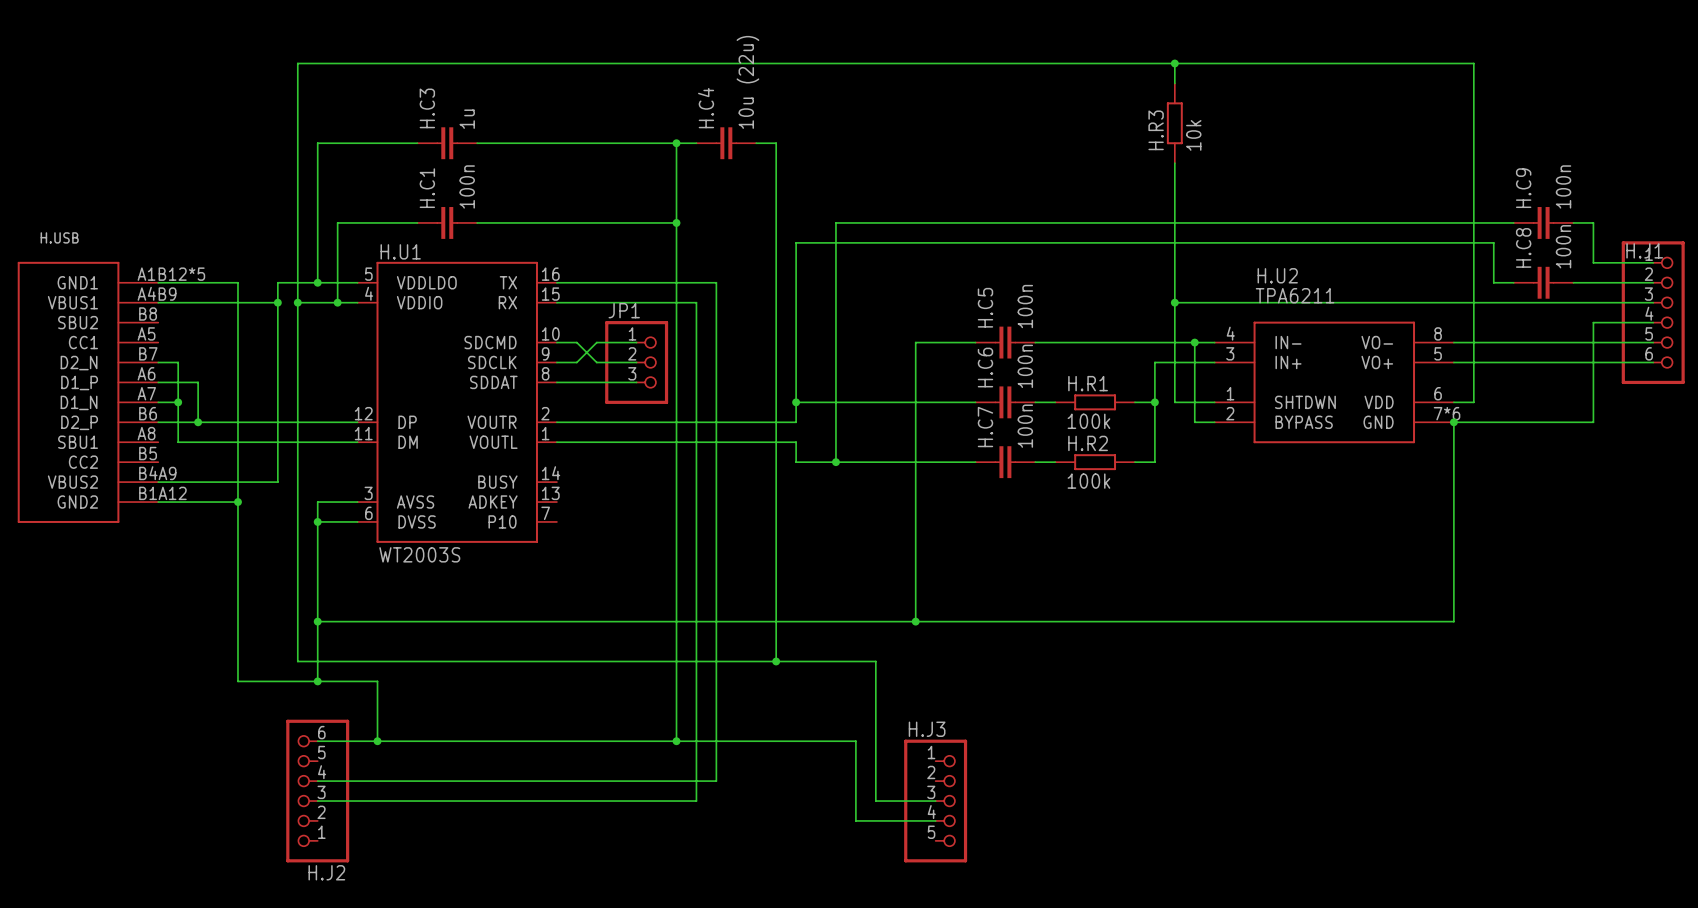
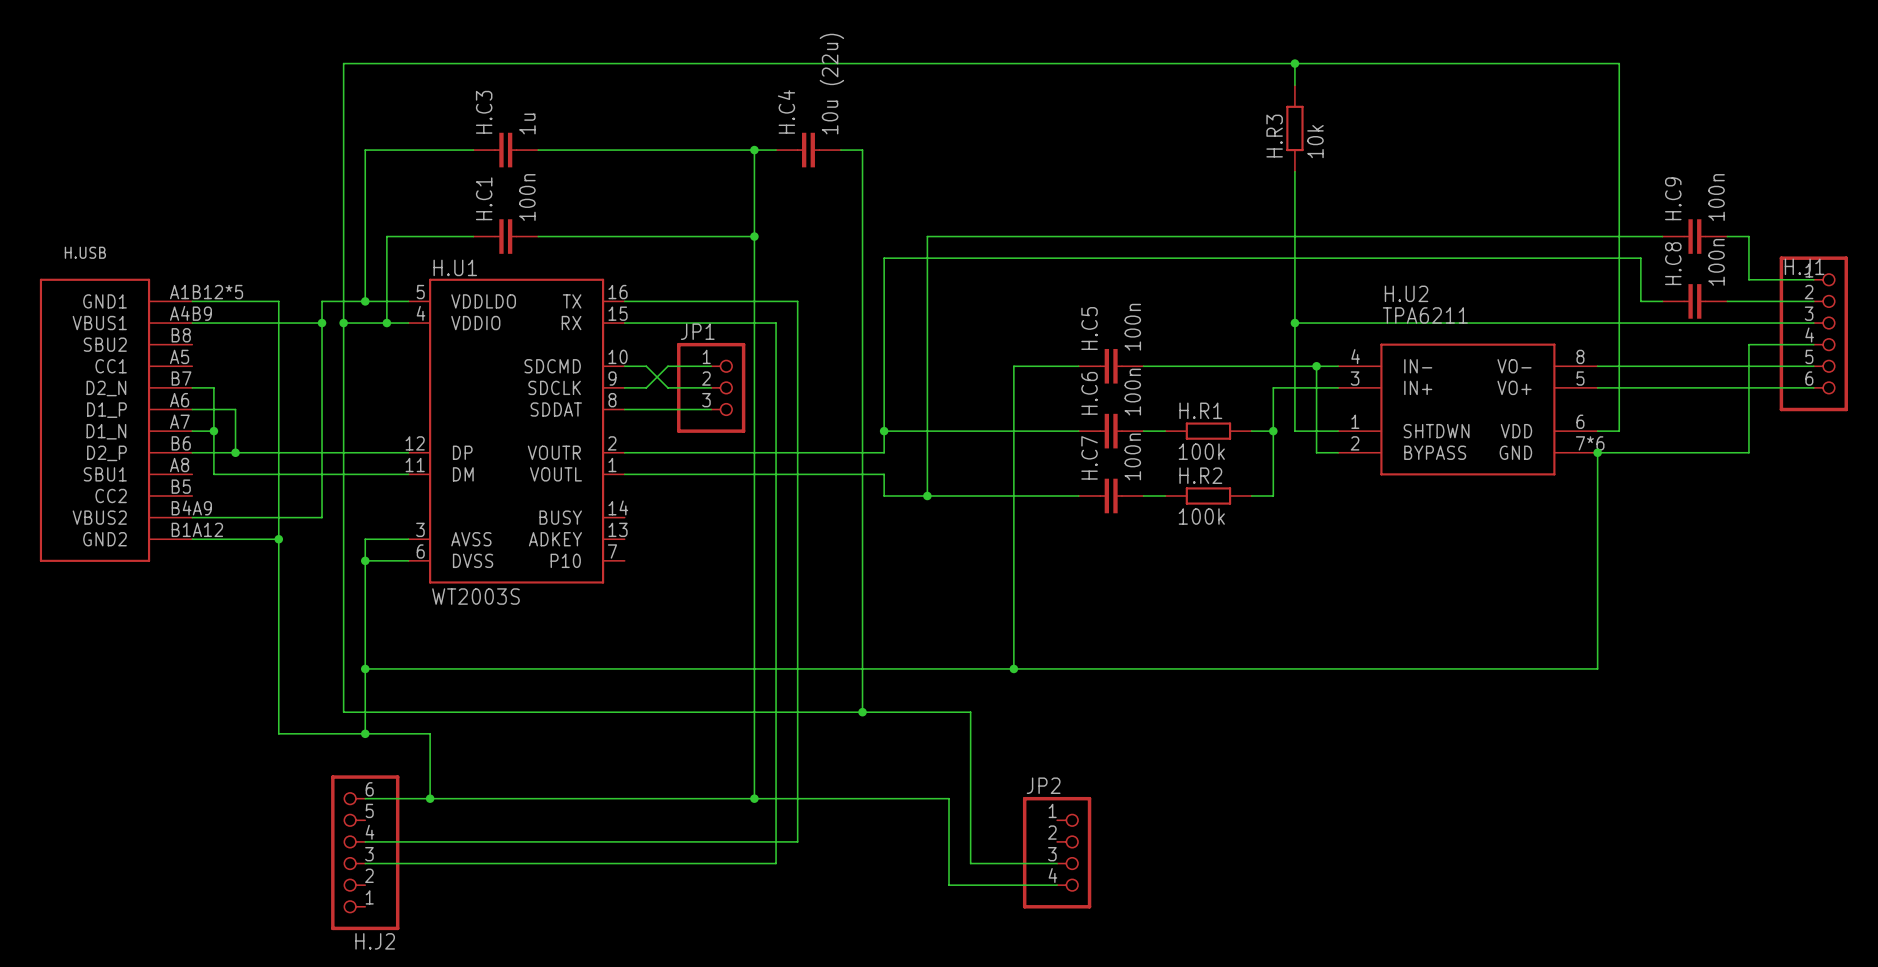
JP2: none -> (1057, 852)
H.J3: (935, 801) -> none

